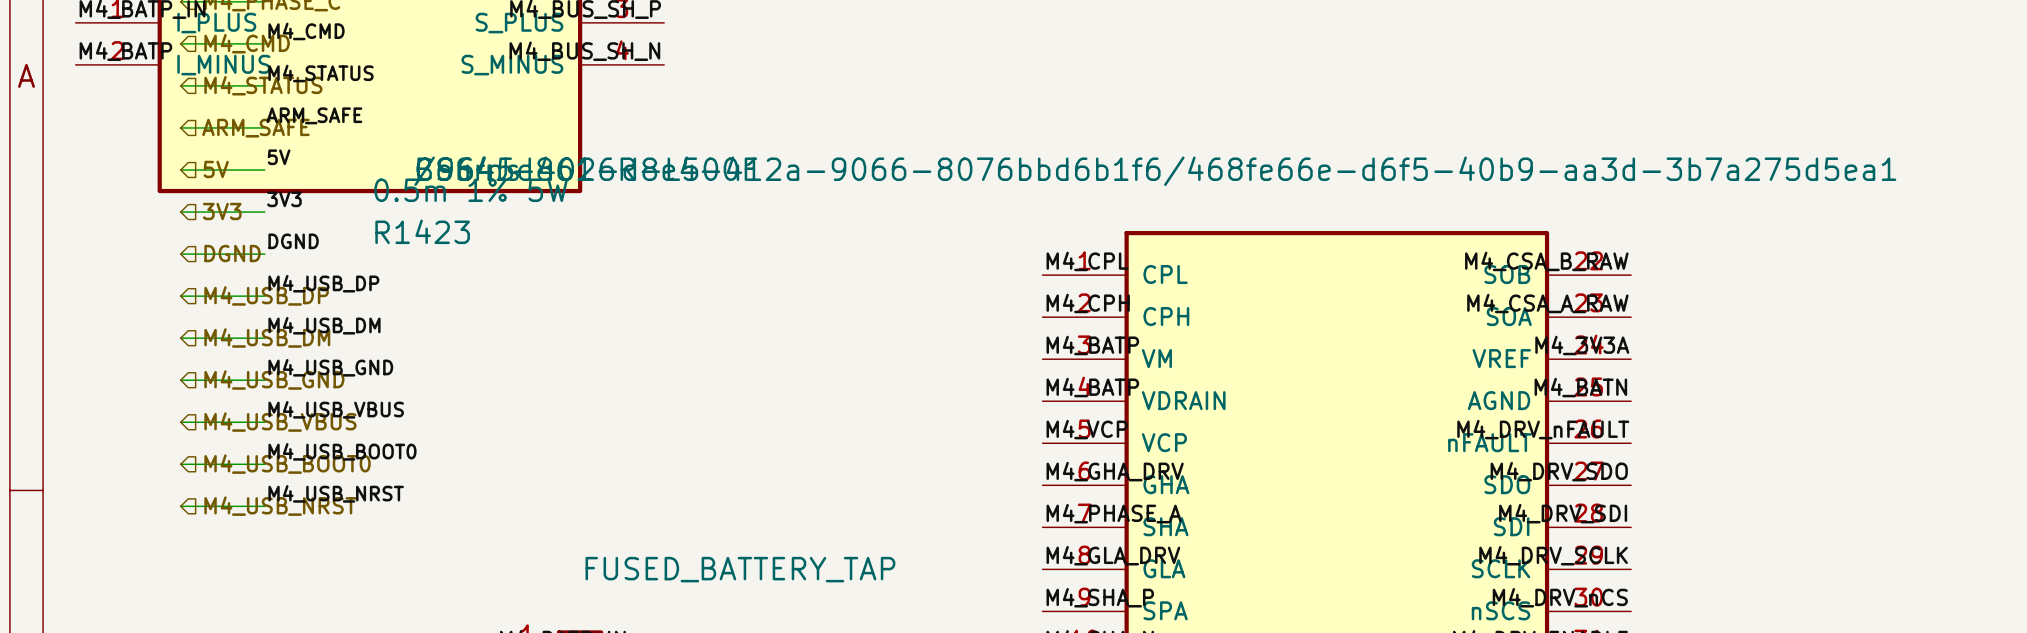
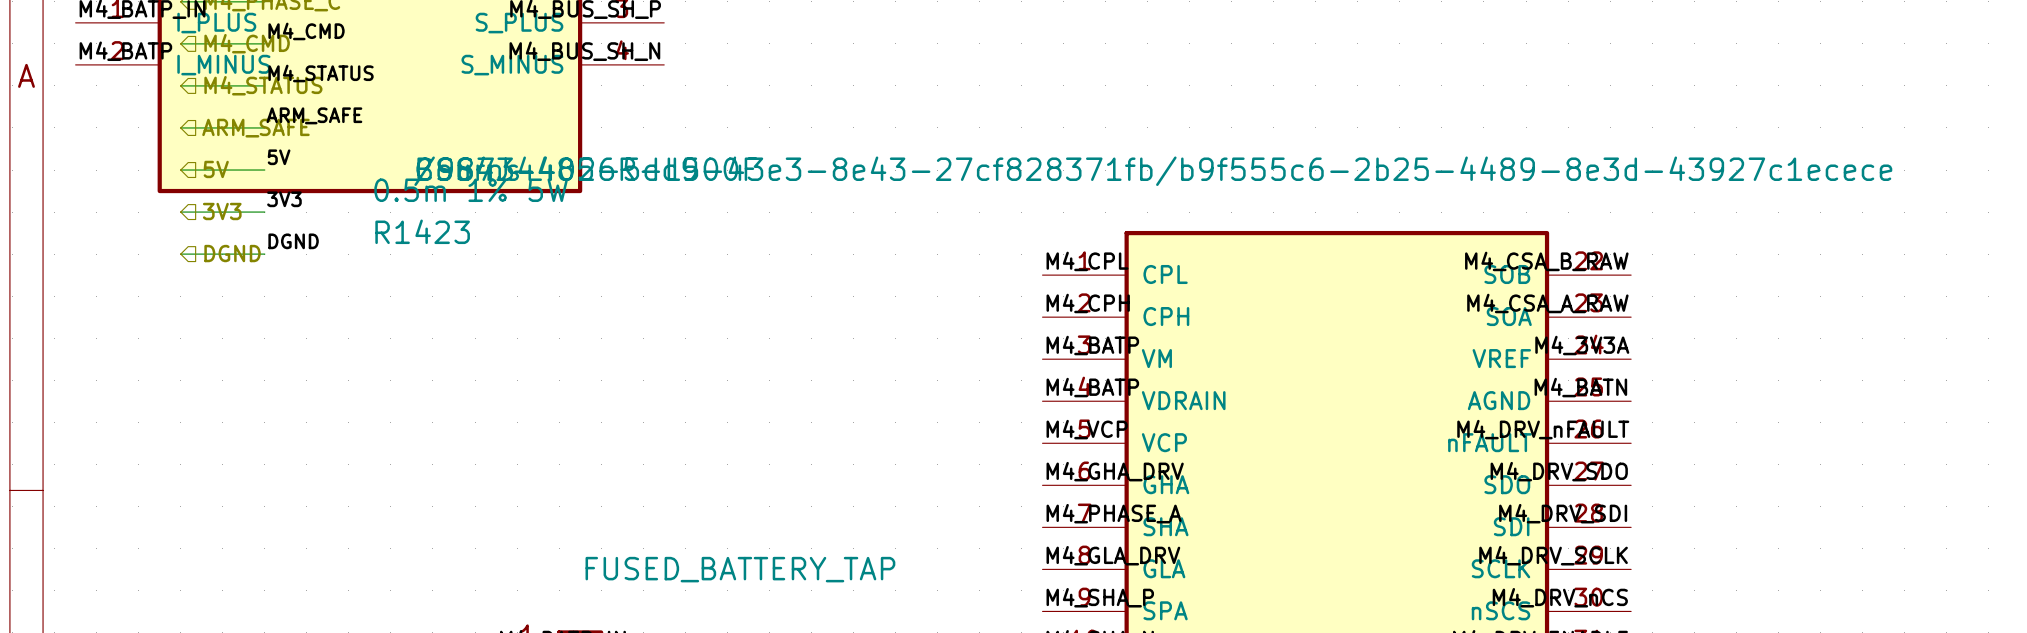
R1423 text: /9645d861-d8e4-412a-9066-8076bbd6b1f6/468fe66e-d6f5-40b9-aa3d-3b7a275d5ea1 (1155, 171) -> /98734485-5dd9-43e3-8e43-27cf828371fb/b9f555c6-2b25-4489-8e3d-43927c1ecece (1153, 171)
label: M4_USB_DP (323, 283) -> none
hierarchical label: M4_USB_DP (266, 295) -> none
wire: (180, 296) (264, 296) -> none
label: M4_USB_DM (324, 325) -> none
hierarchical label: M4_USB_DM (267, 337) -> none
wire: (180, 338) (264, 338) -> none
label: M4_USB_GND (330, 367) -> none
wire: (180, 380) (264, 380) -> none
hierarchical label: M4_USB_GND (274, 380) -> none
label: M4_USB_VBUS (336, 409) -> none
wire: (180, 422) (264, 422) -> none
hierarchical label: M4_USB_VBUS (280, 422) -> none
label: M4_USB_BOOT0 (342, 451) -> none
wire: (180, 464) (264, 464) -> none
hierarchical label: M4_USB_BOOT0 (287, 464) -> none
label: M4_USB_NRST (336, 493) -> none
wire: (180, 506) (264, 506) -> none
hierarchical label: M4_USB_NRST (280, 506) -> none

